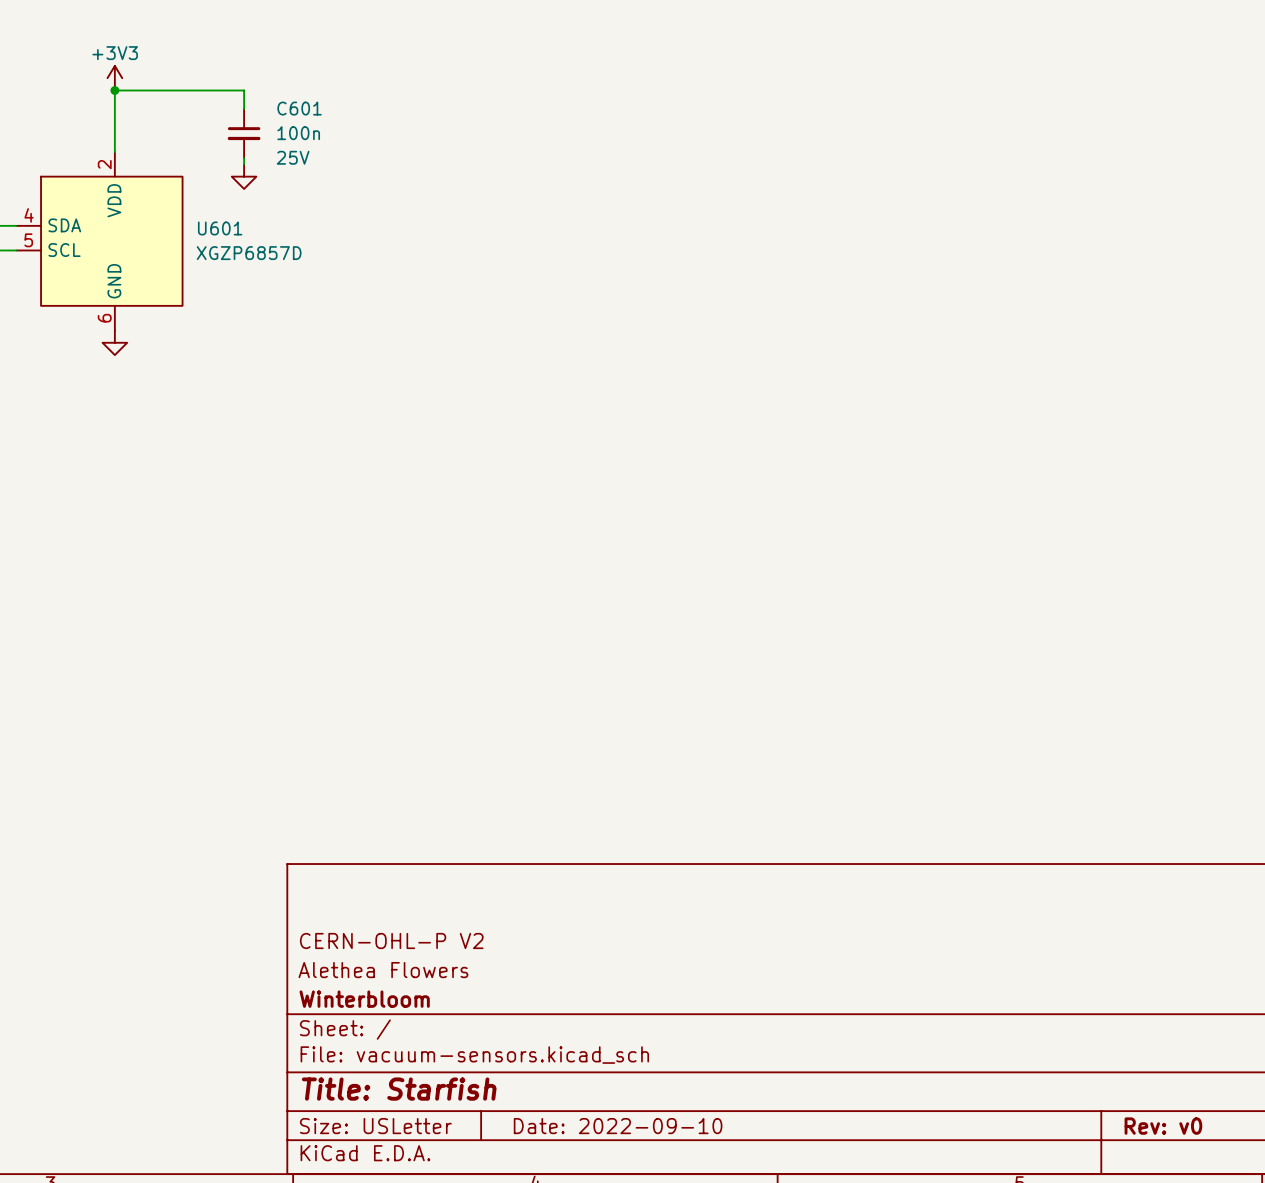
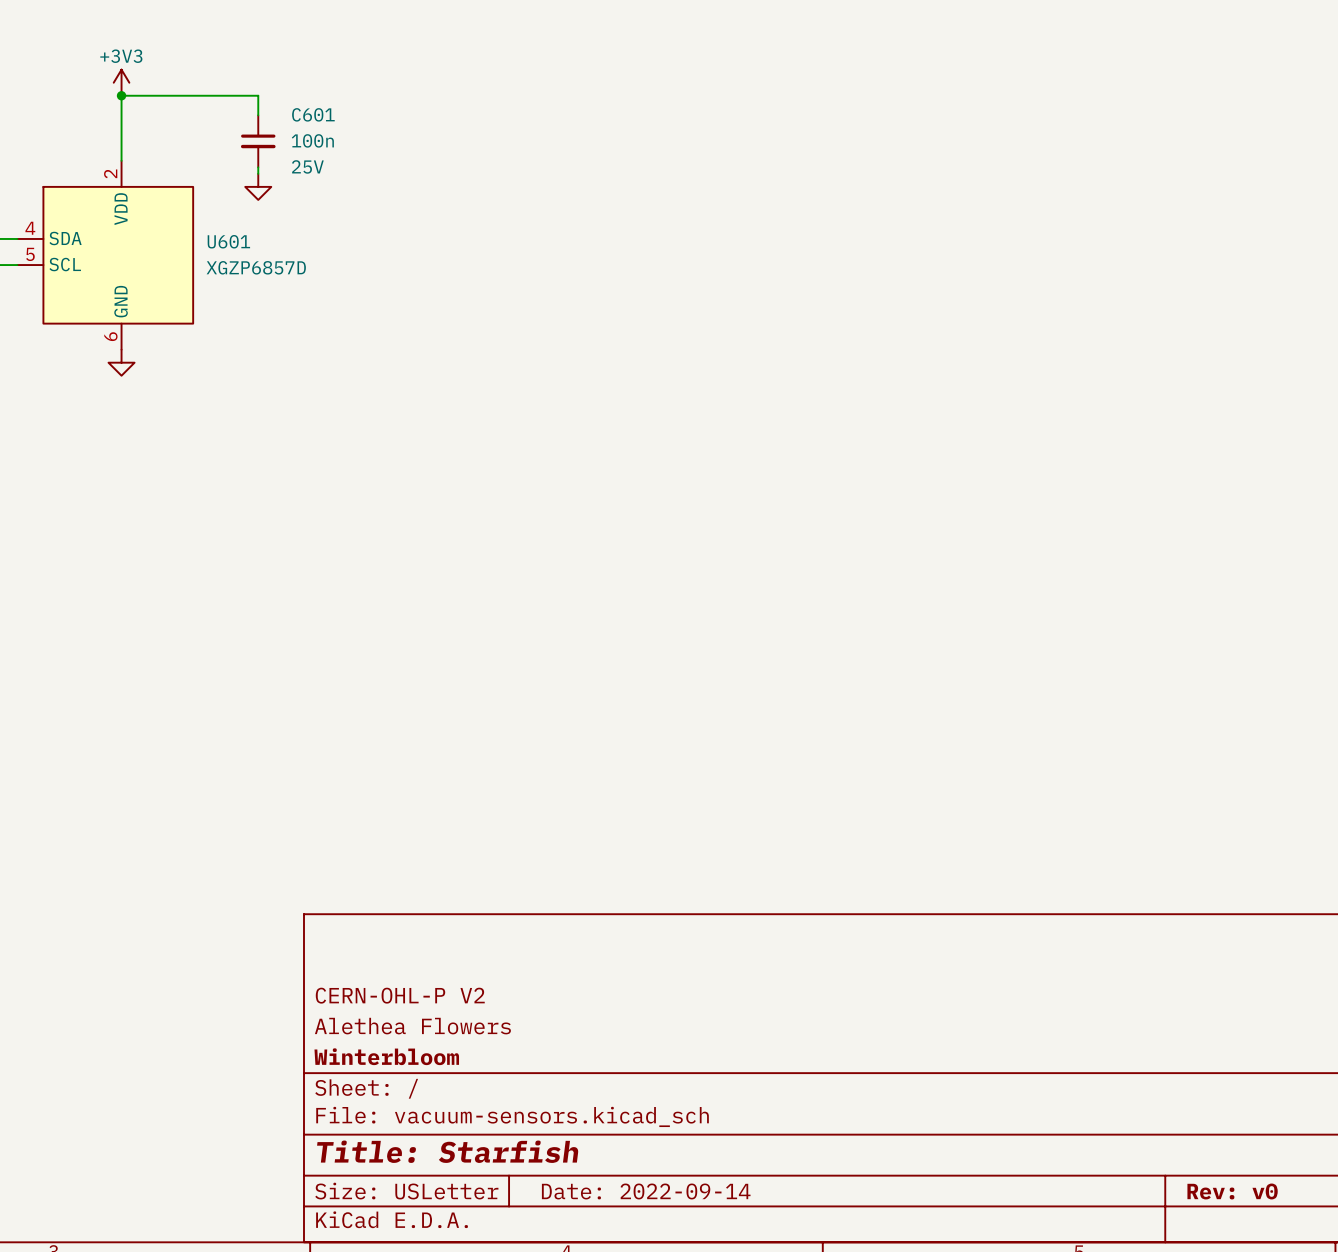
title block: Date: 2022-09-10 (618, 1126) -> Date: 2022-09-14 (646, 1191)

